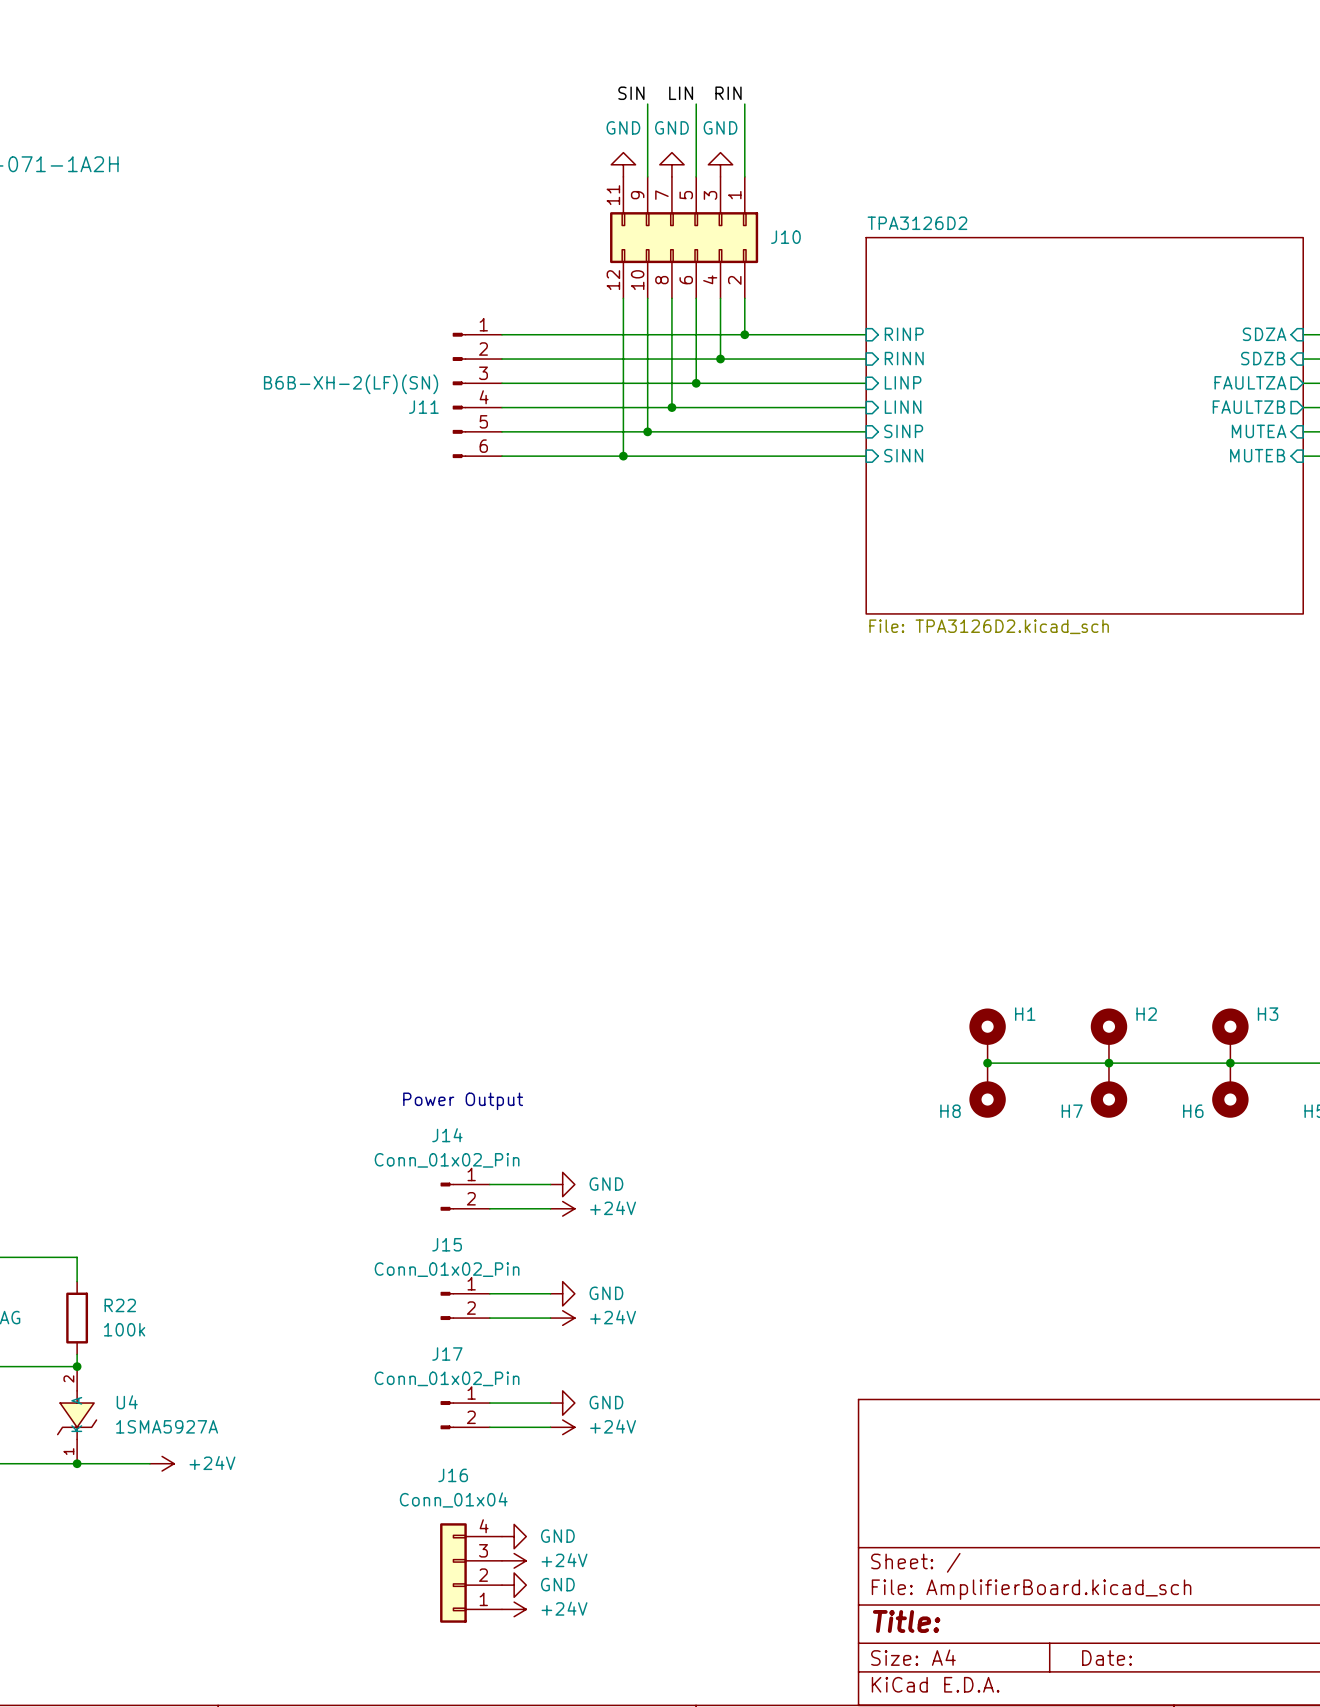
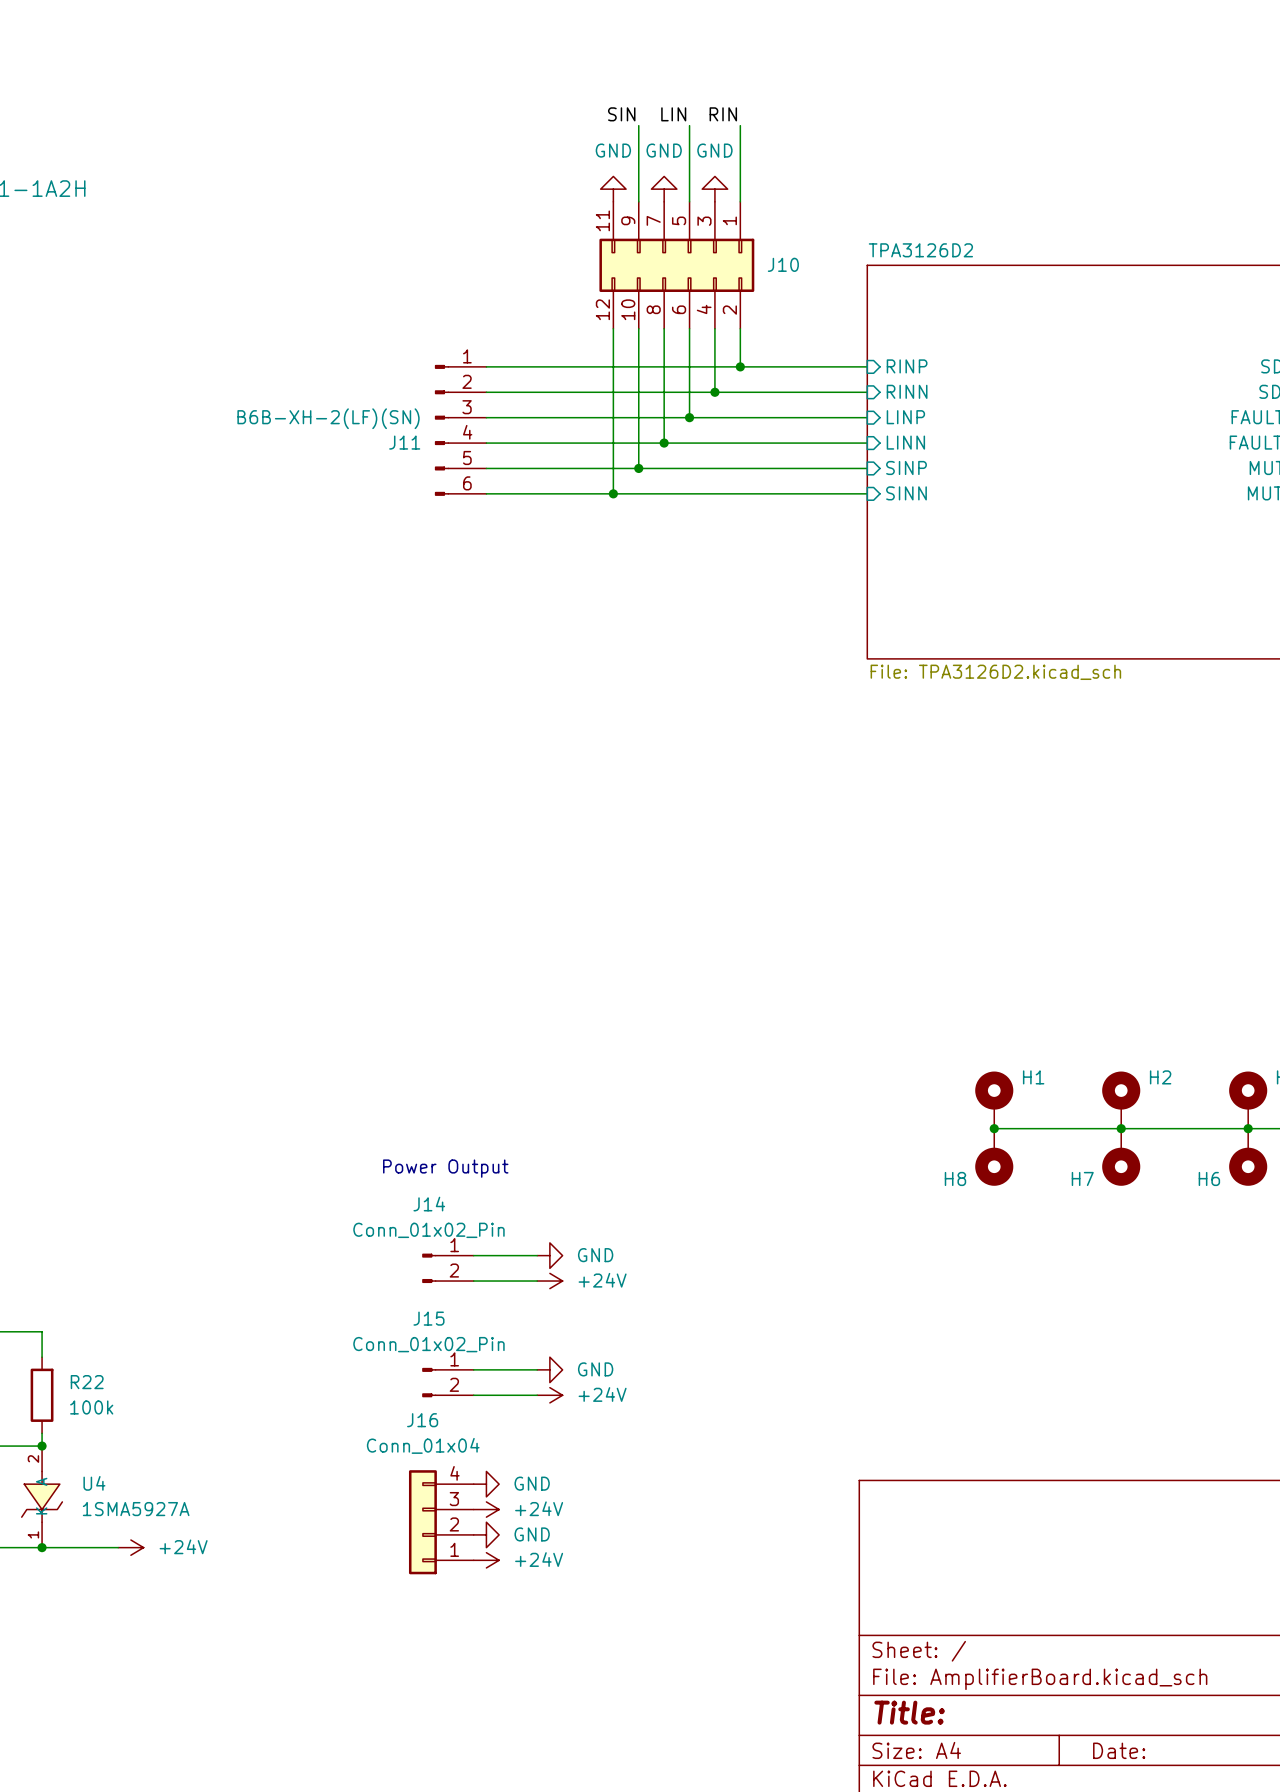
wire: (489, 1403) (550, 1403) -> none
power symbol: none -> GND (486, 1484)
power symbol: GND (562, 1403) -> none
J17: Conn_01x02_Pin (465, 1415) -> none
wire: (489, 1427) (550, 1427) -> none
power symbol: none -> +24V (486, 1509)
power symbol: +24V (562, 1427) -> none
power symbol: none -> GND (486, 1534)
power symbol: none -> +24V (486, 1560)
power symbol: GND (514, 1536) -> none
power symbol: +24V (514, 1560) -> none
J16 position: (471, 1572) -> (441, 1522)
power symbol: GND (514, 1585) -> none
power symbol: +24V (514, 1609) -> none

